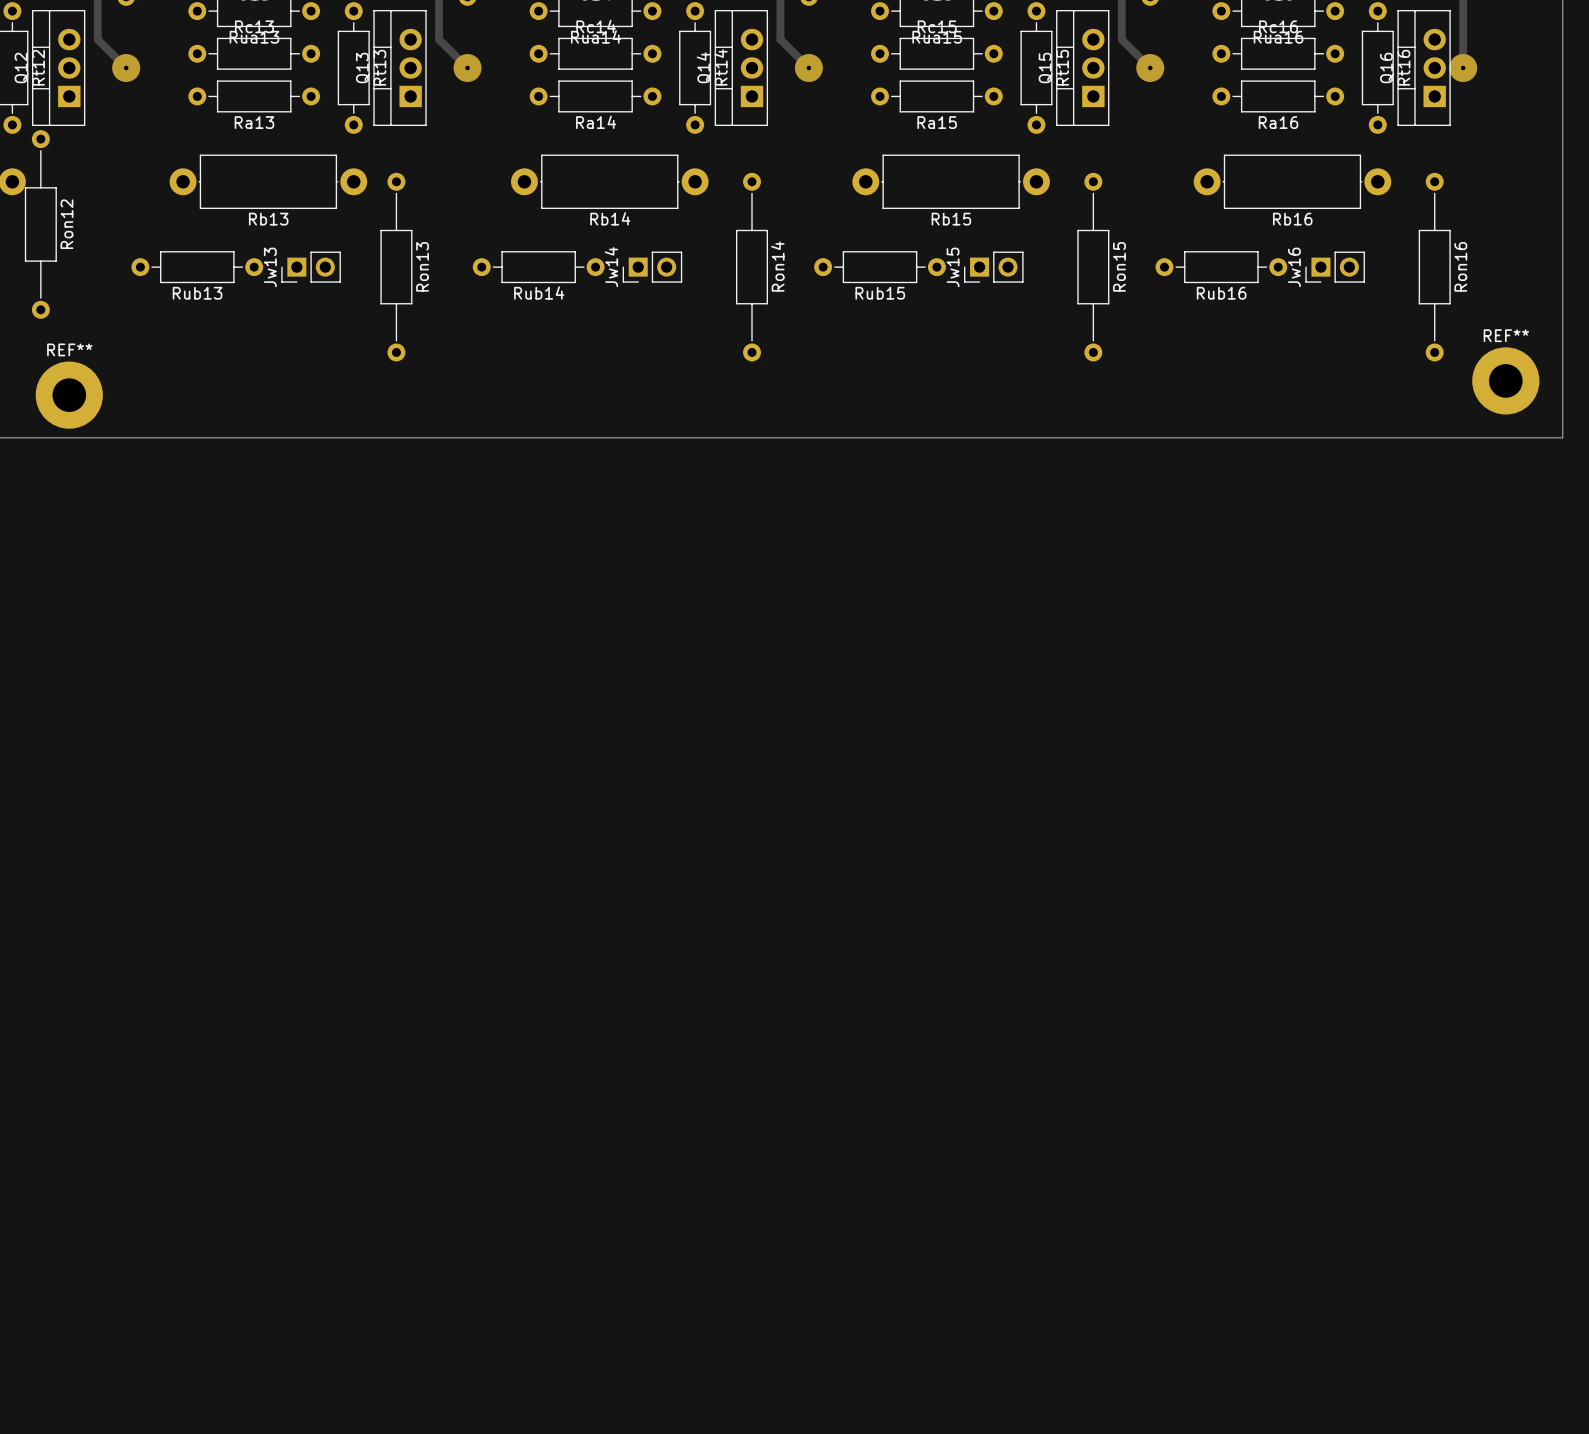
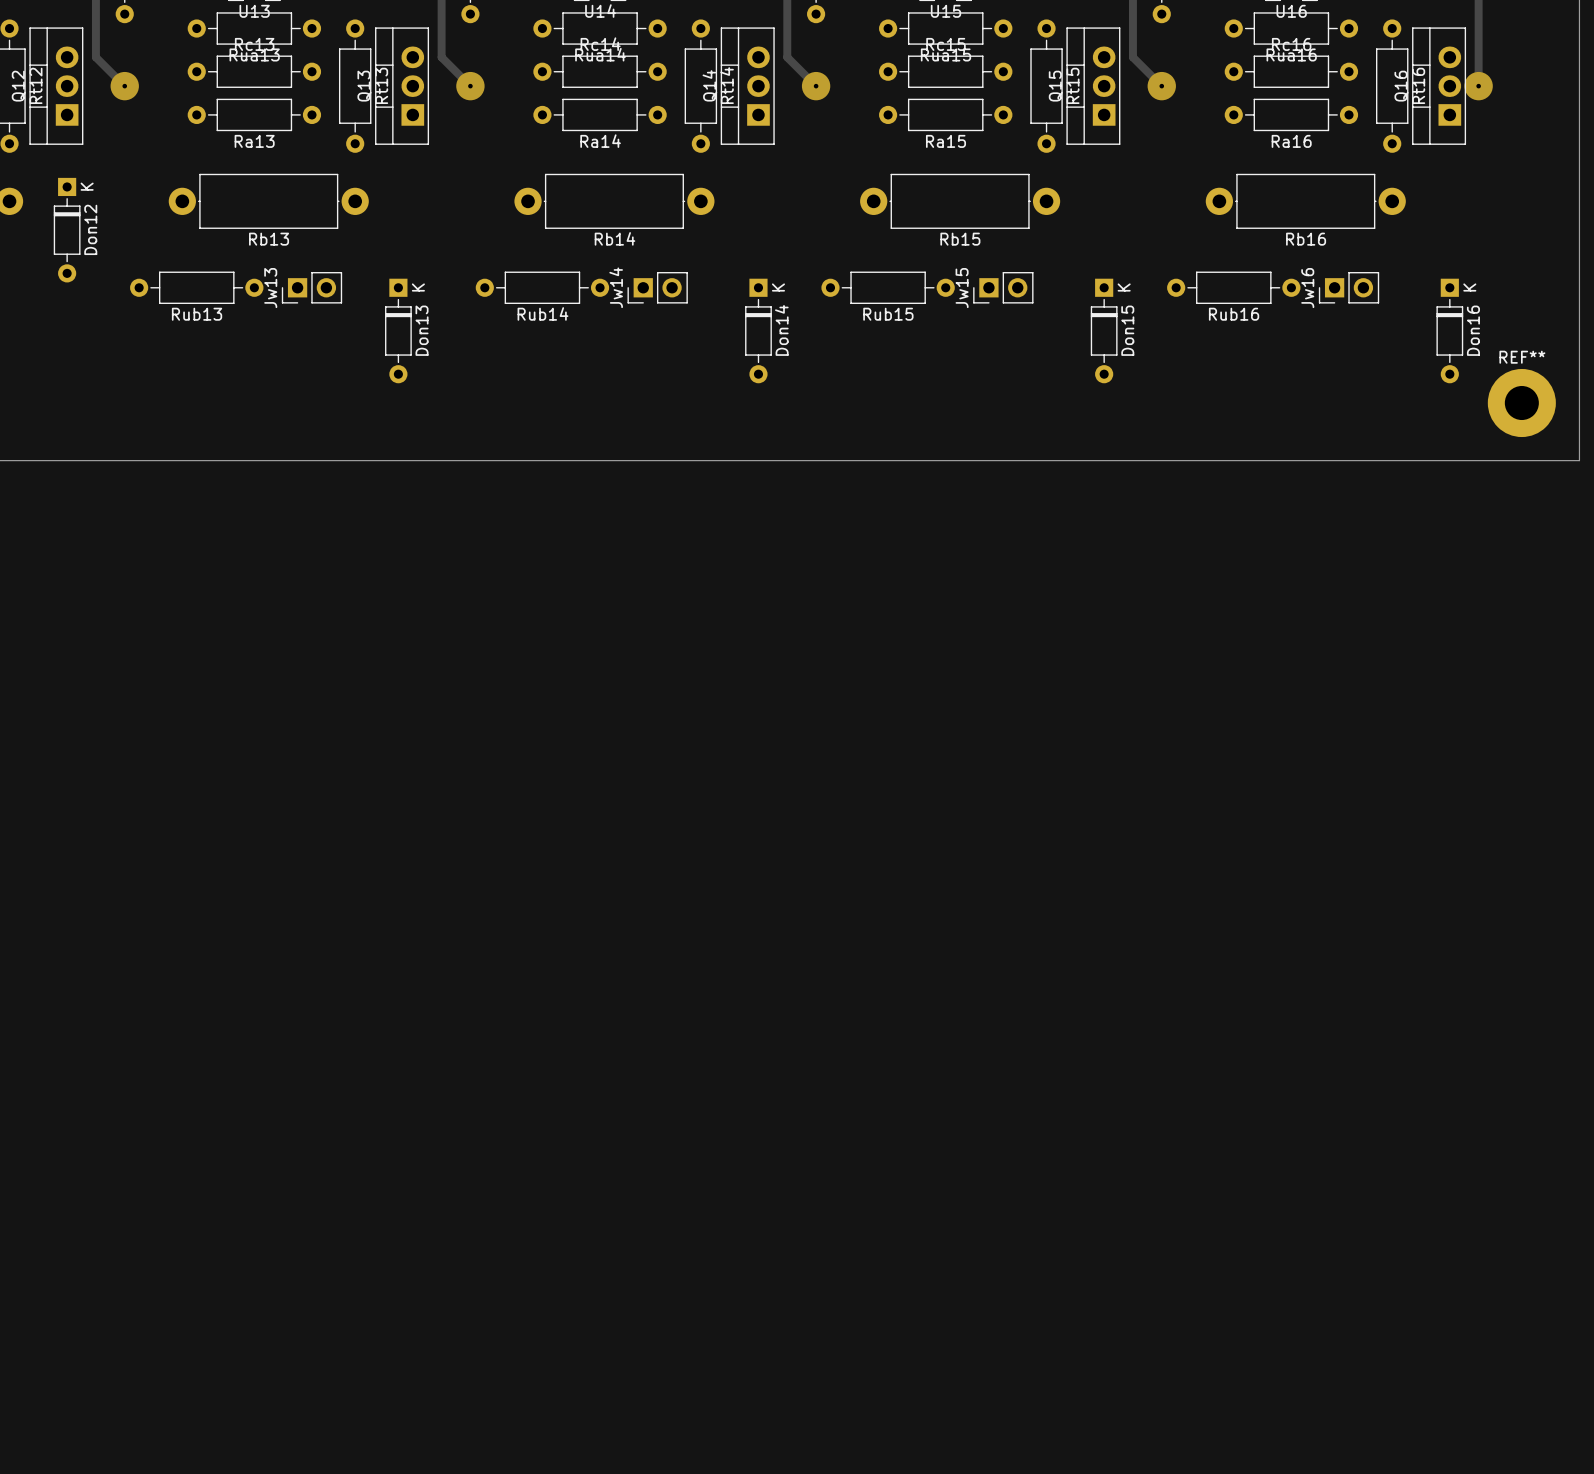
Don12: none -> (67, 230)
Ron12: (40, 224) -> none
Ron13: (396, 267) -> none
Ron14: (752, 267) -> none
Ron15: (1093, 267) -> none
Ron16: (1434, 267) -> none
Don13: none -> (398, 330)
Don14: none -> (758, 330)
Don15: none -> (1104, 330)
Don16: none -> (1449, 330)
REF**: (69, 395) -> none

